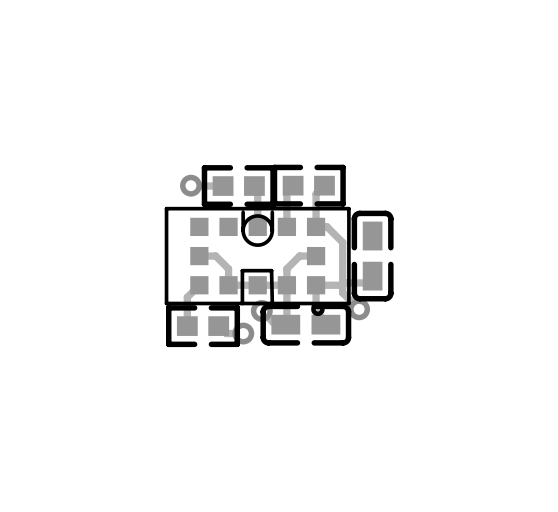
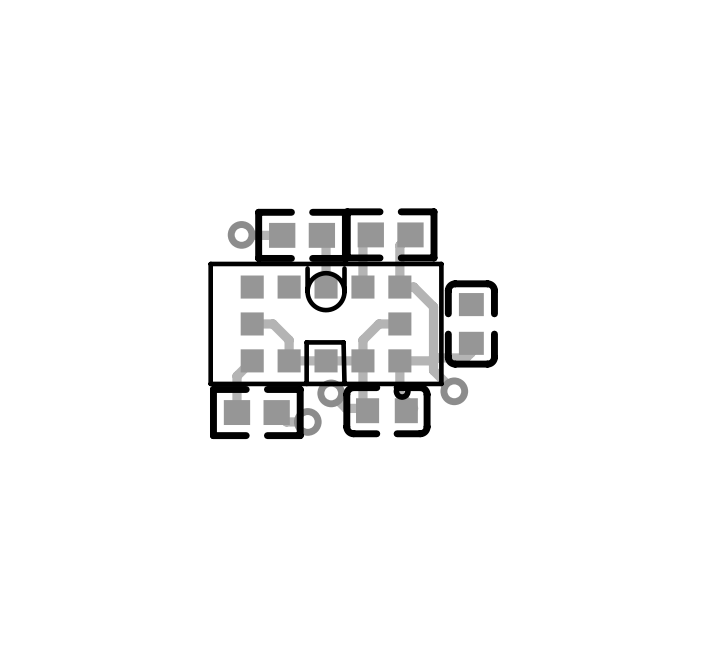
part footprint: [351, 210, 394, 302] -> [444, 280, 498, 368]
part footprint: [260, 303, 352, 346] -> [343, 384, 431, 438]

